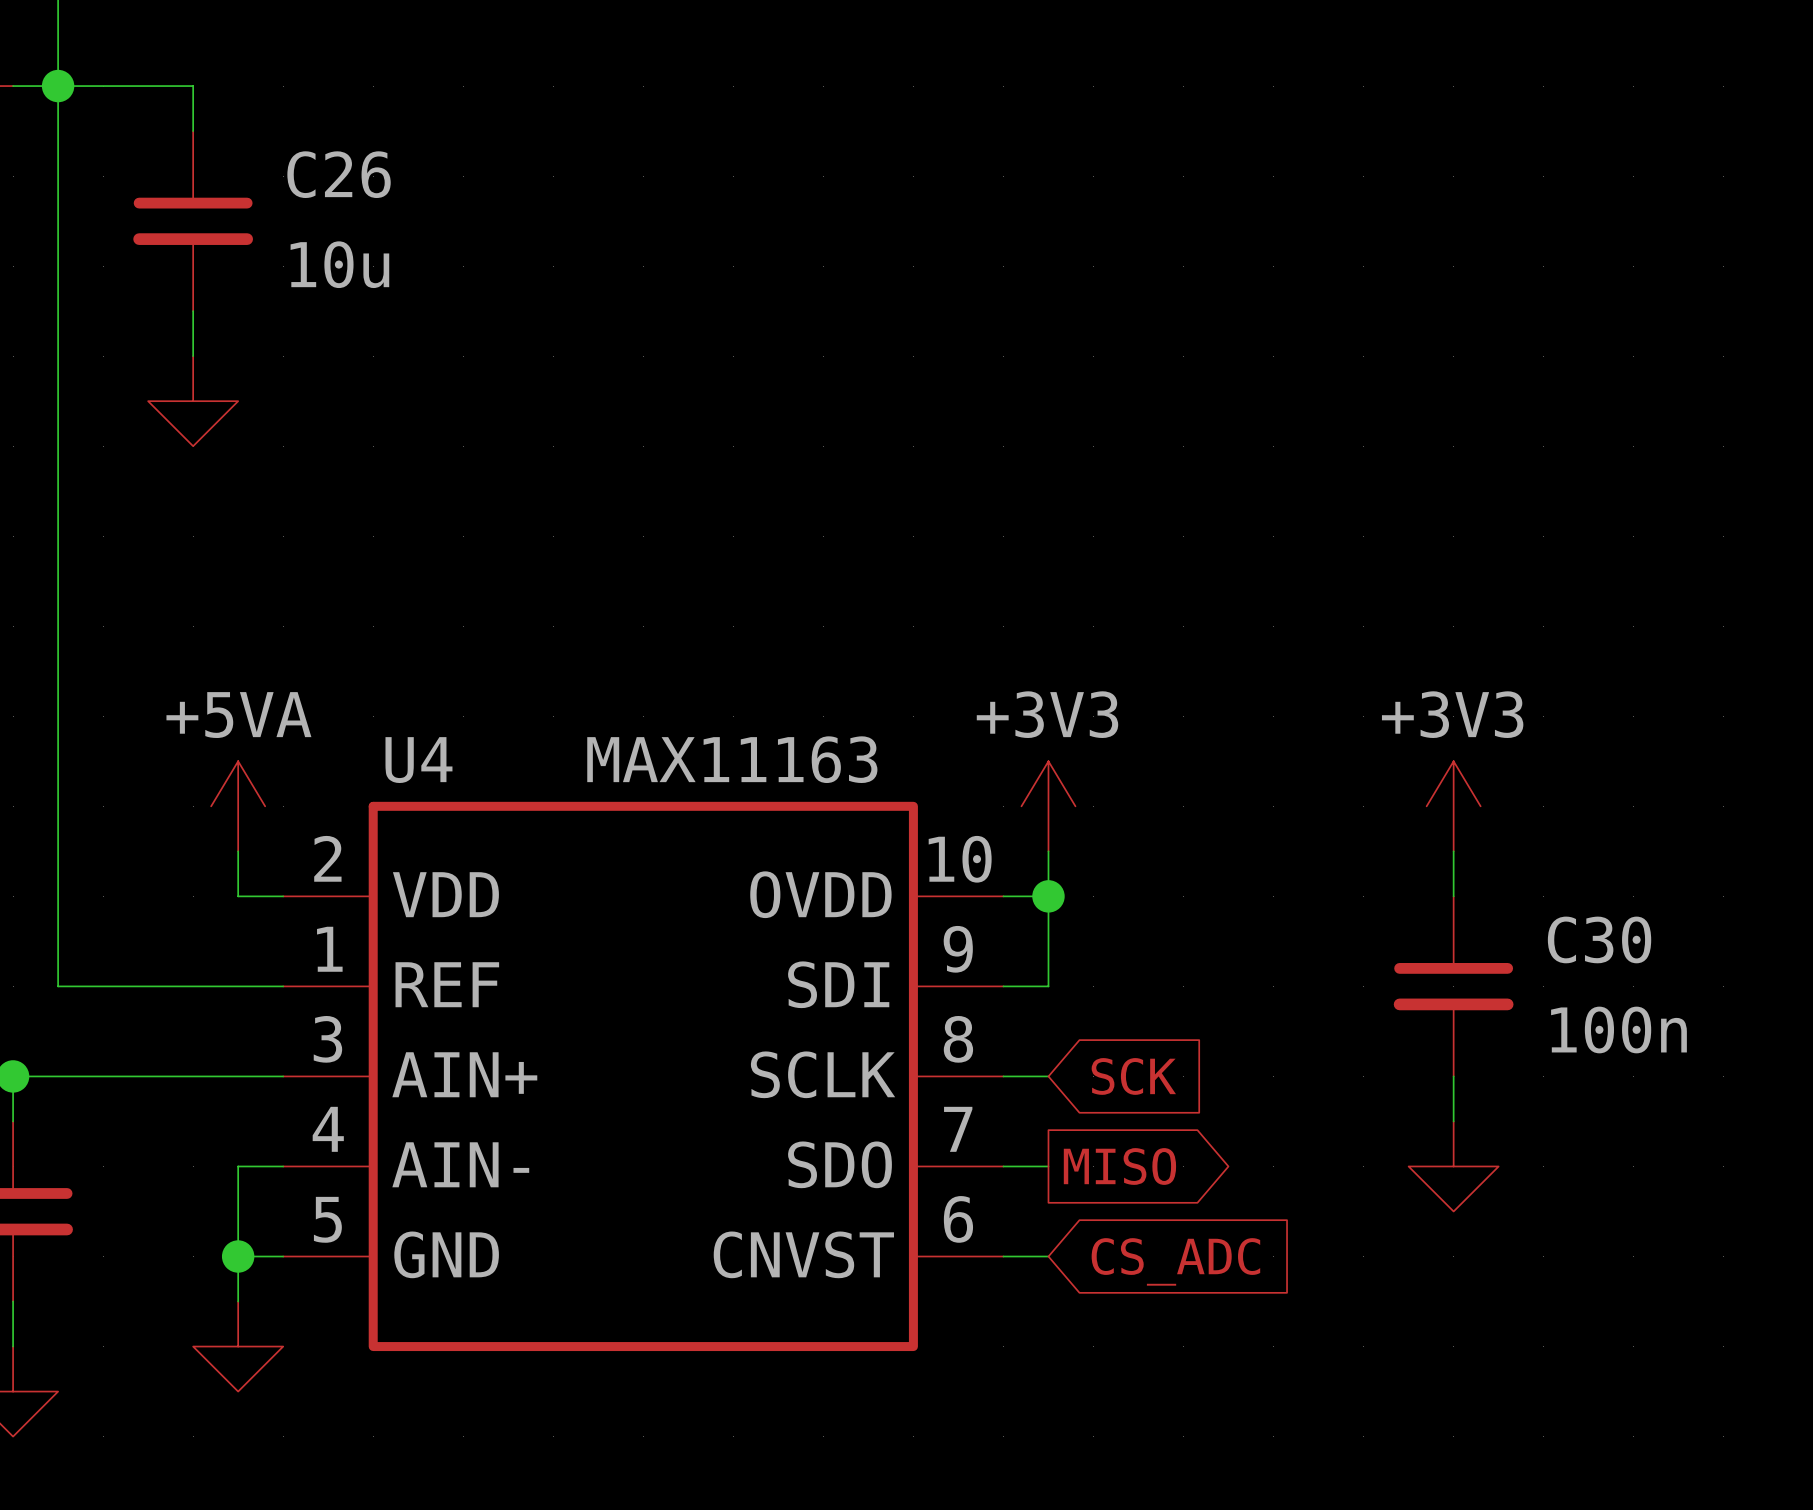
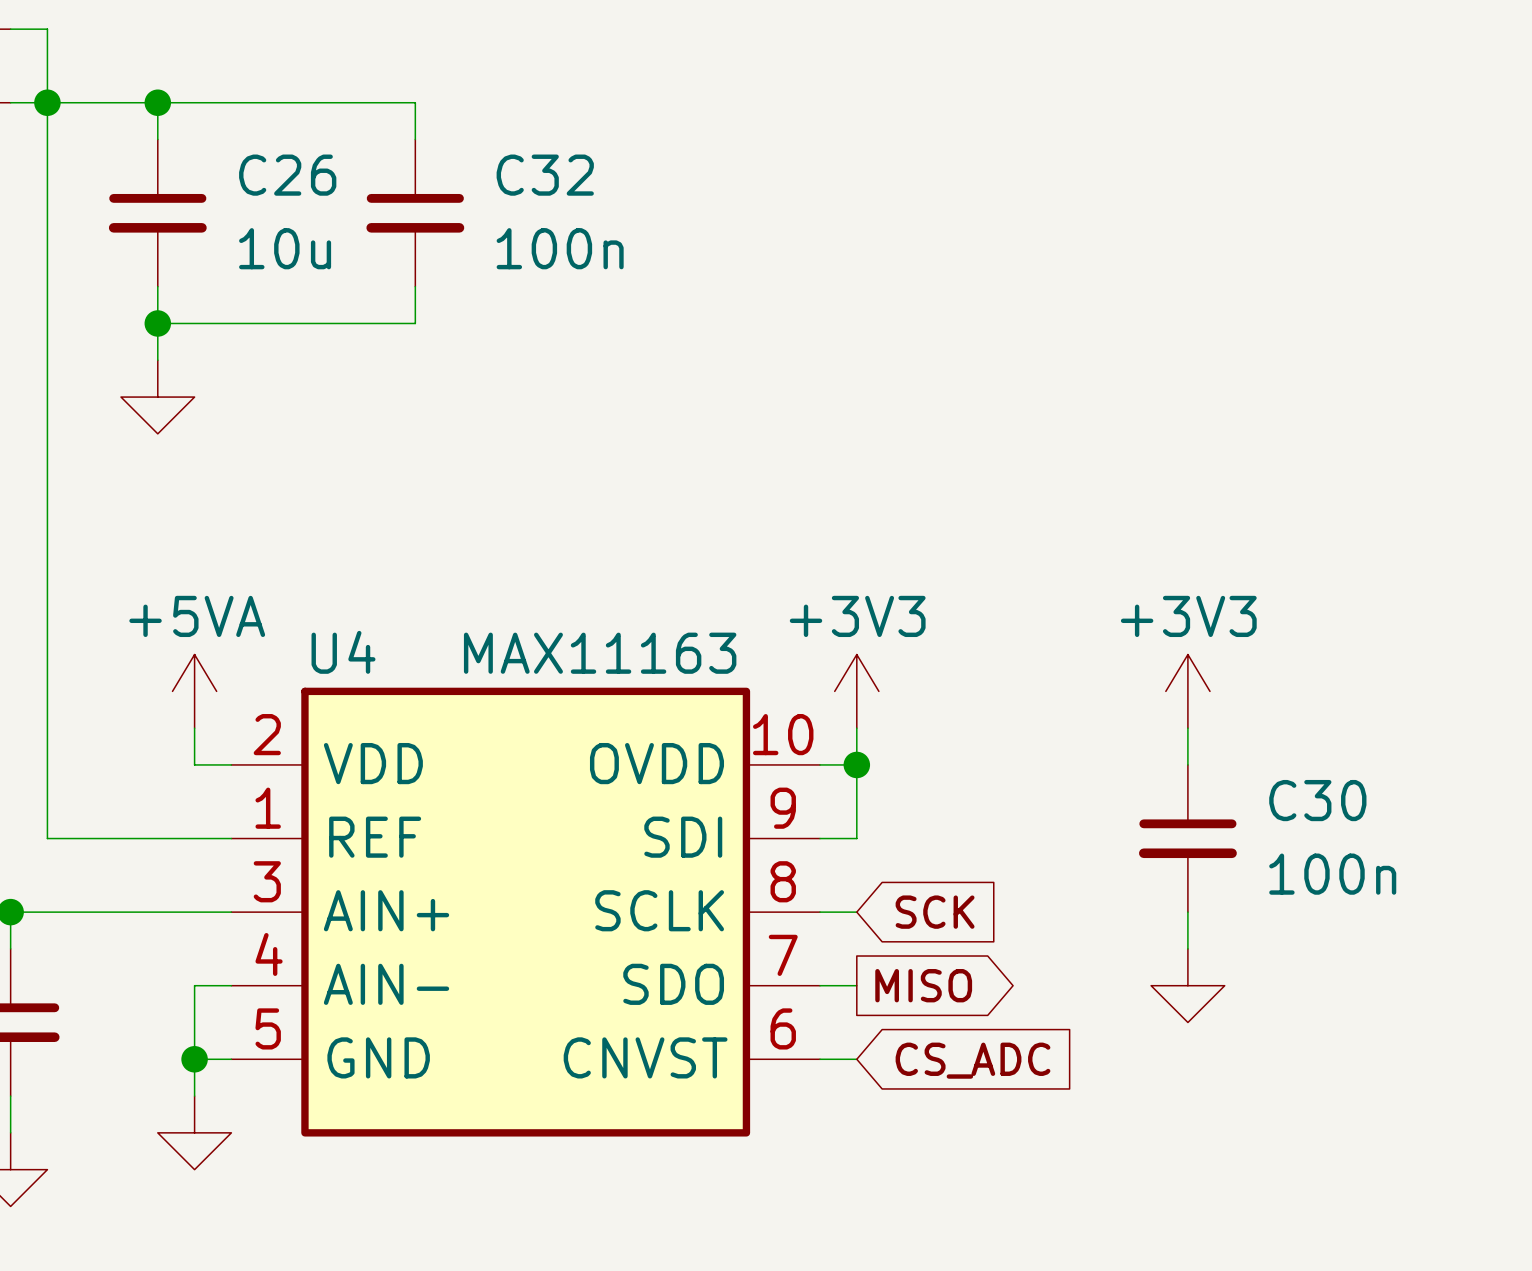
wire: none -> (157, 102) (415, 102) (415, 139)
junction: none -> (157, 102)
C32: none -> 100n (415, 213)
wire: none -> (415, 286) (415, 323) (157, 323) (157, 360)
junction: none -> (157, 323)
power symbol position: (193, 401) -> (157, 397)

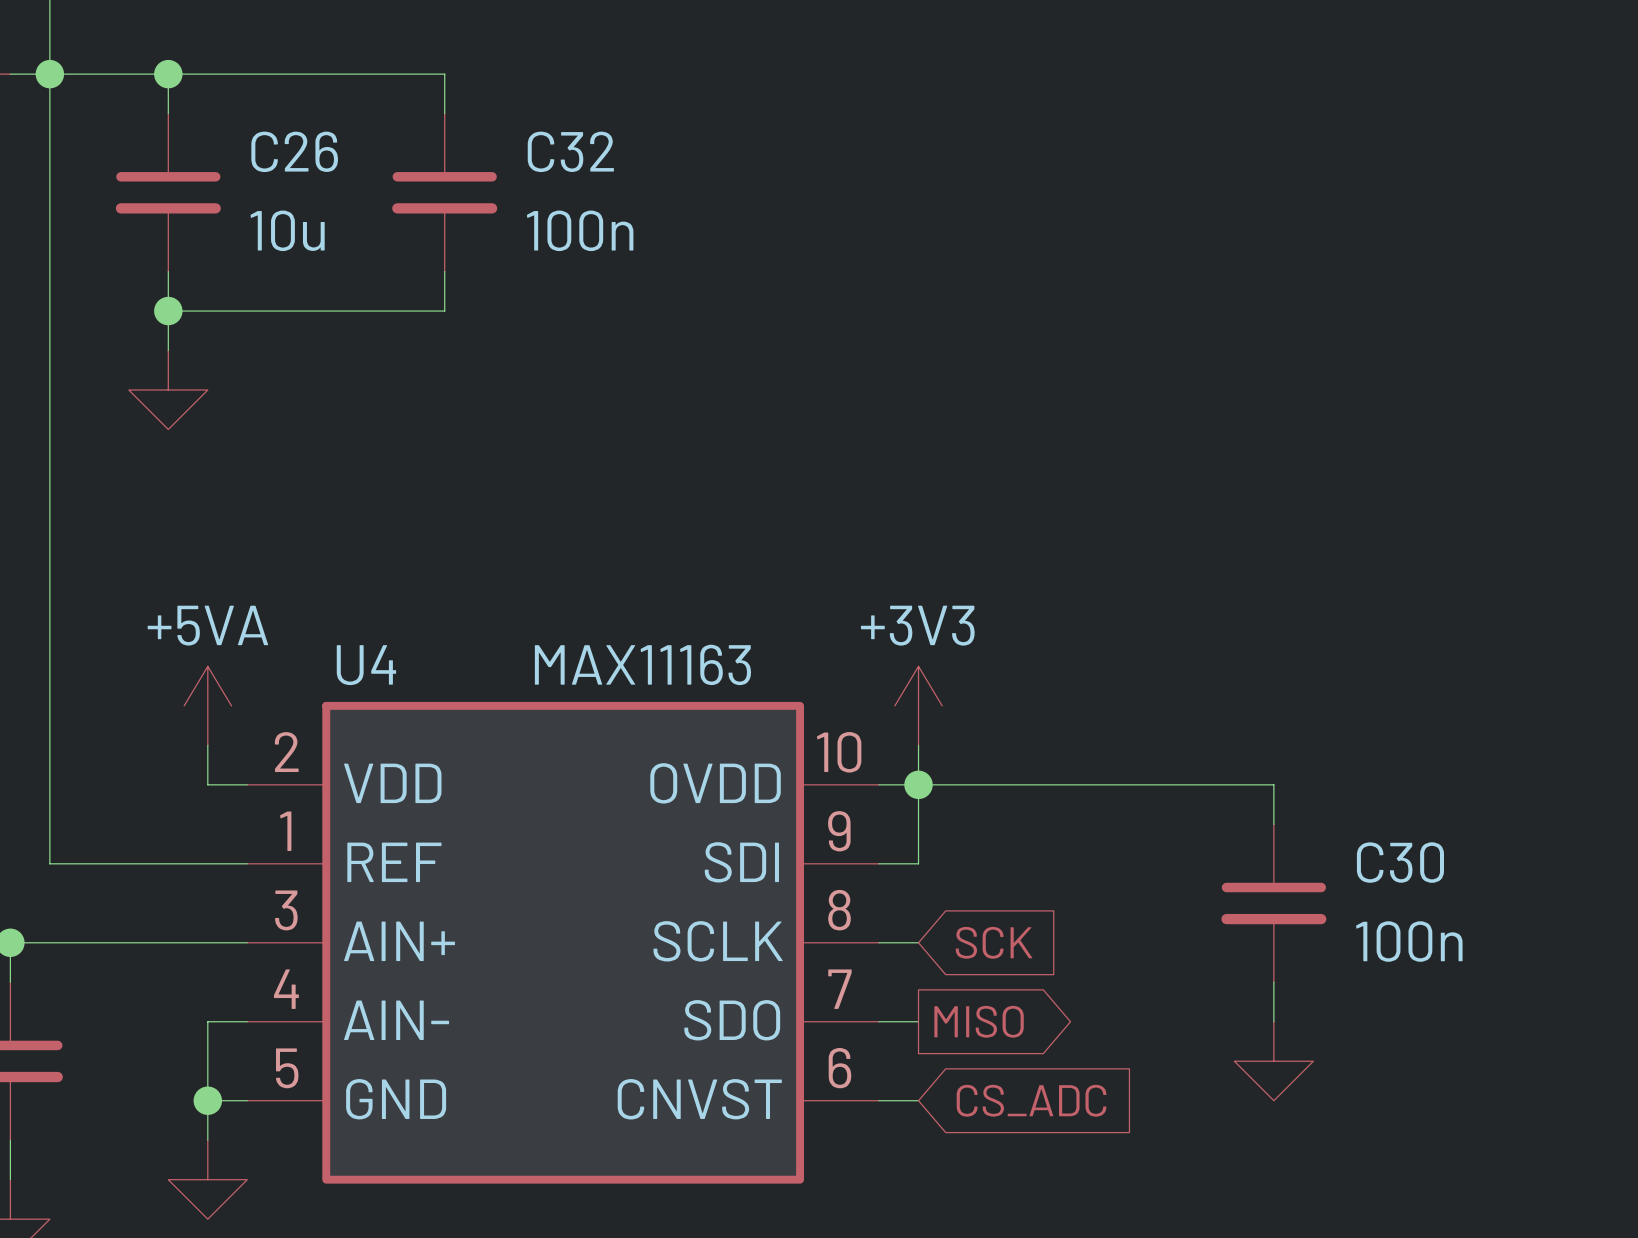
power symbol: +3V3 (1187, 691) -> none
wire: (1187, 728) (1187, 764) -> none
wire: none -> (918, 784) (1273, 784) (1273, 824)
C30 position: (1187, 838) -> (1273, 903)
power symbol position: (1187, 985) -> (1273, 1061)

